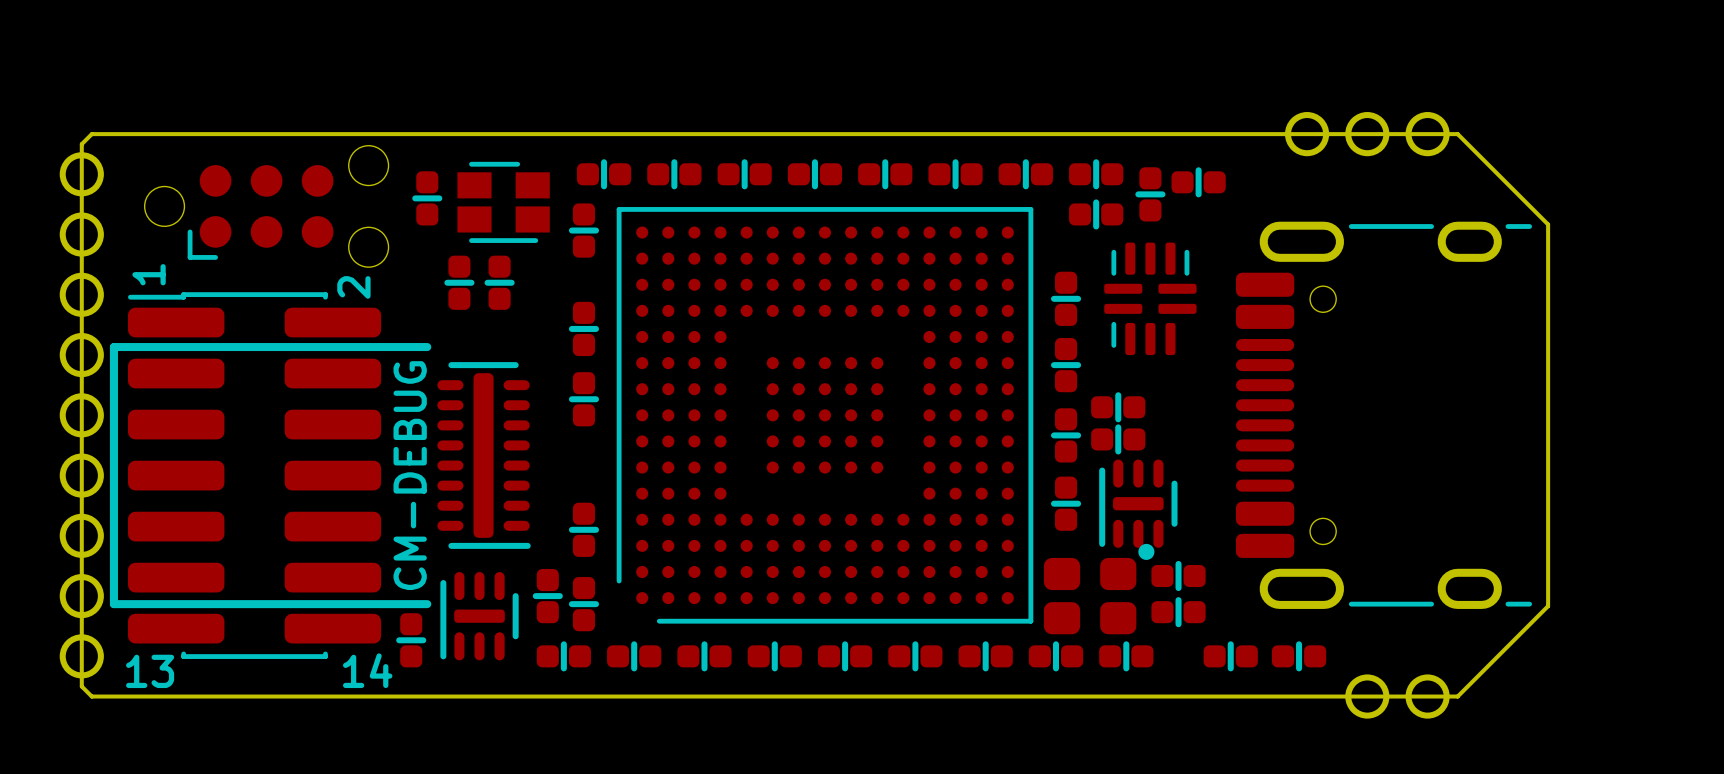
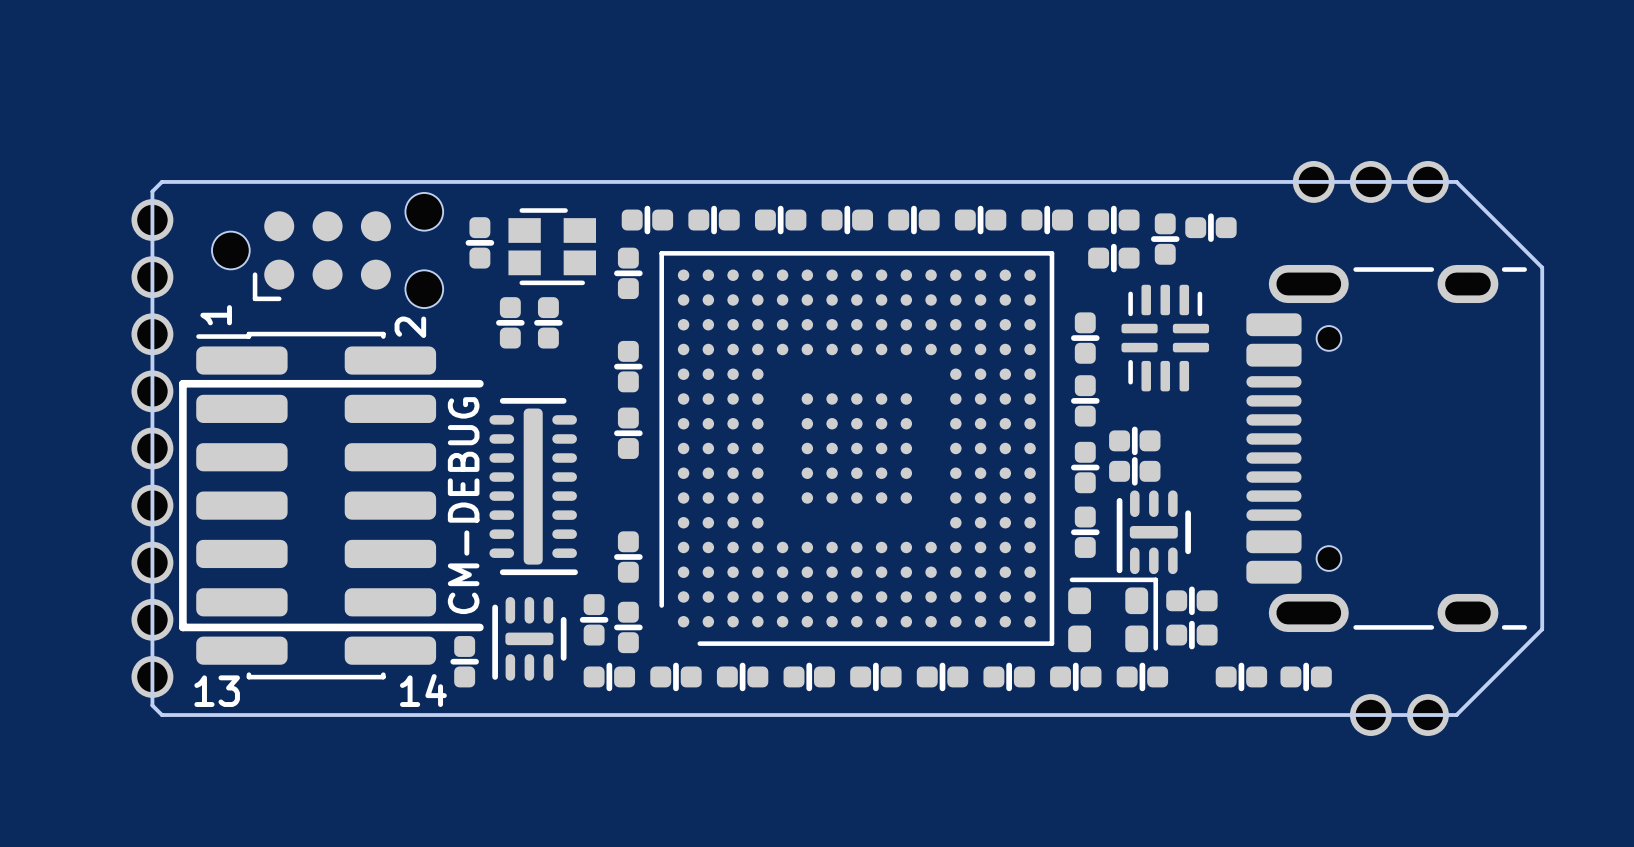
part footprint: [1043, 543, 1155, 635] -> [1068, 577, 1159, 653]

